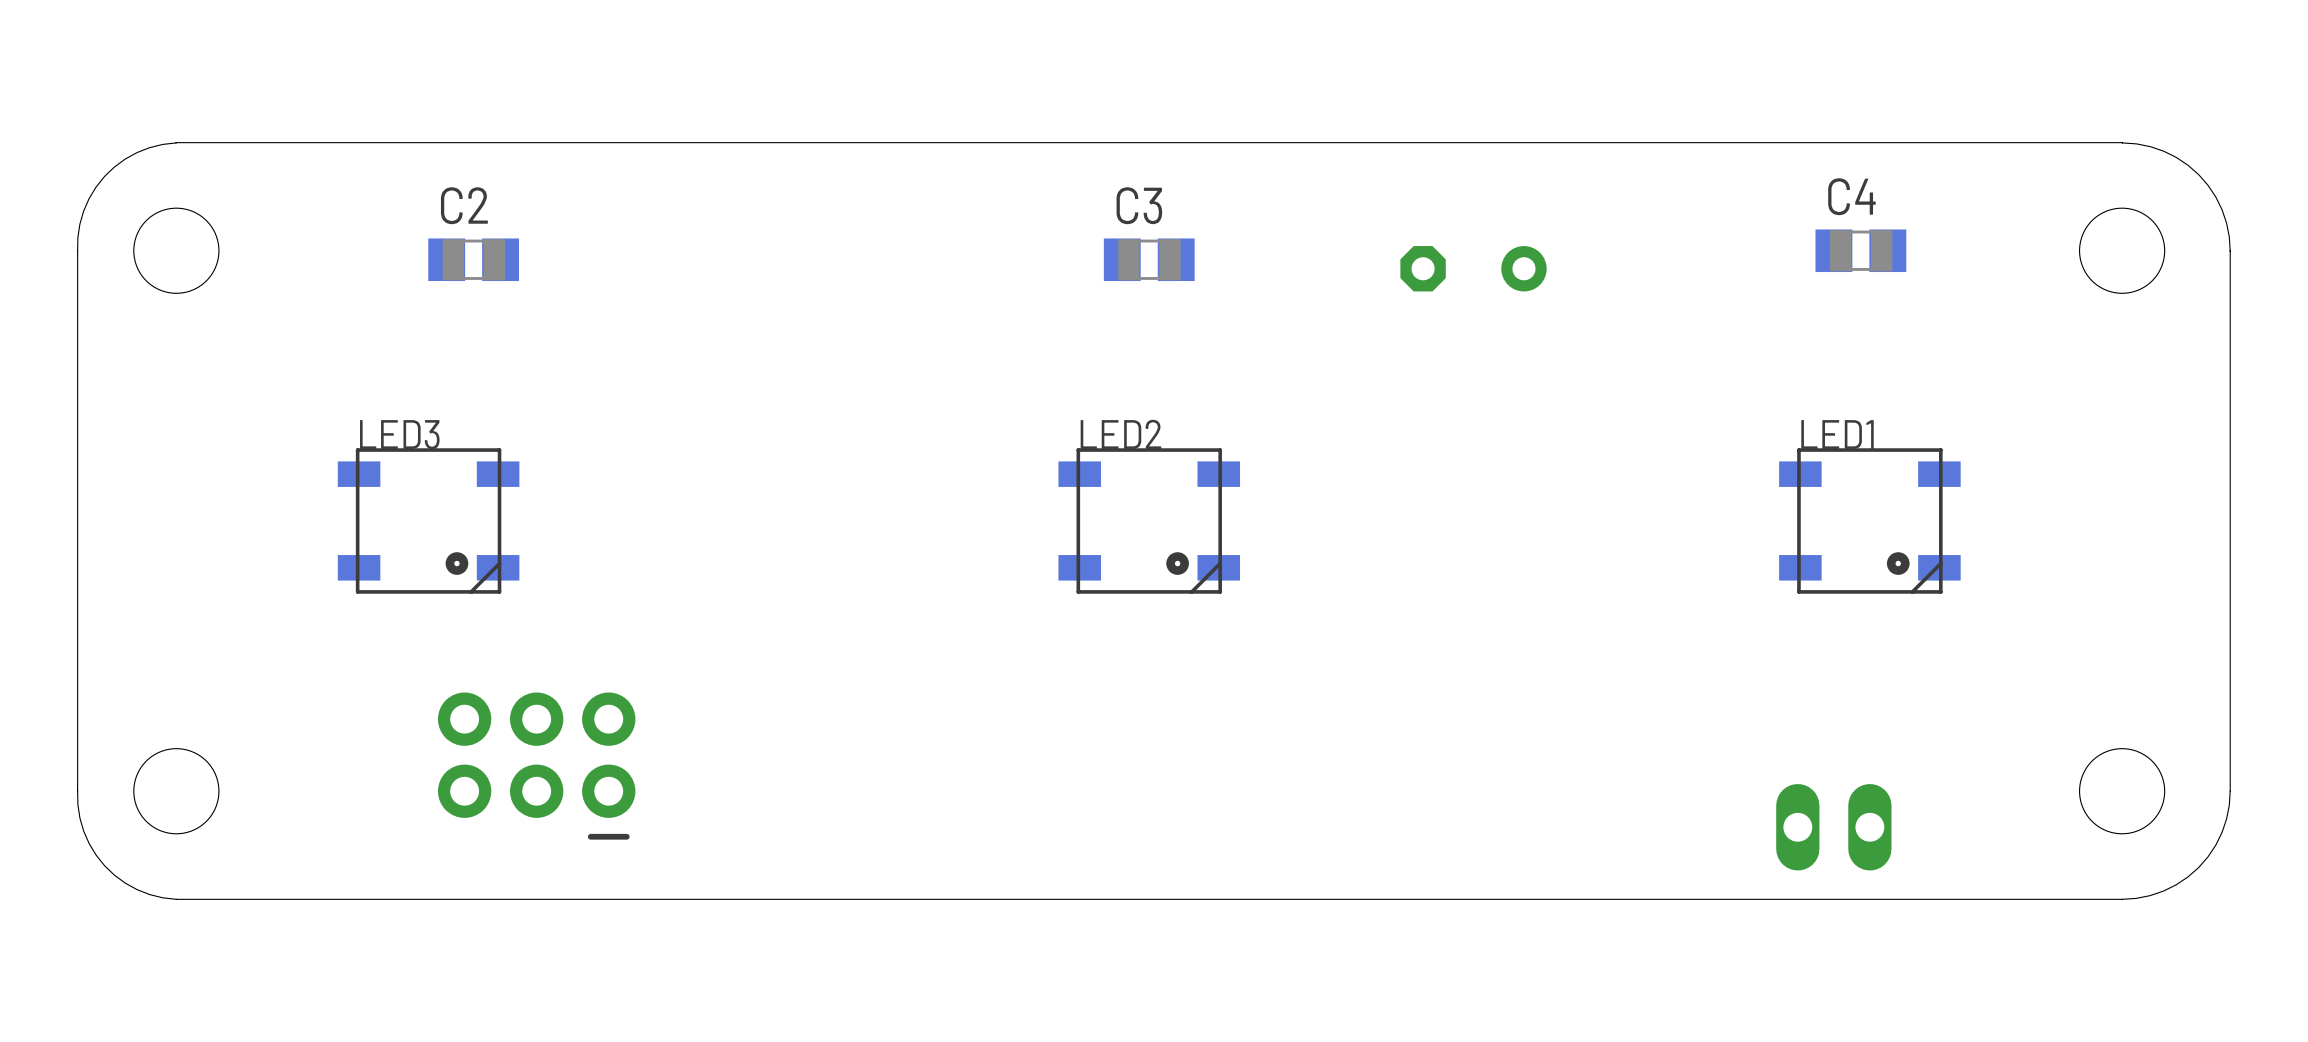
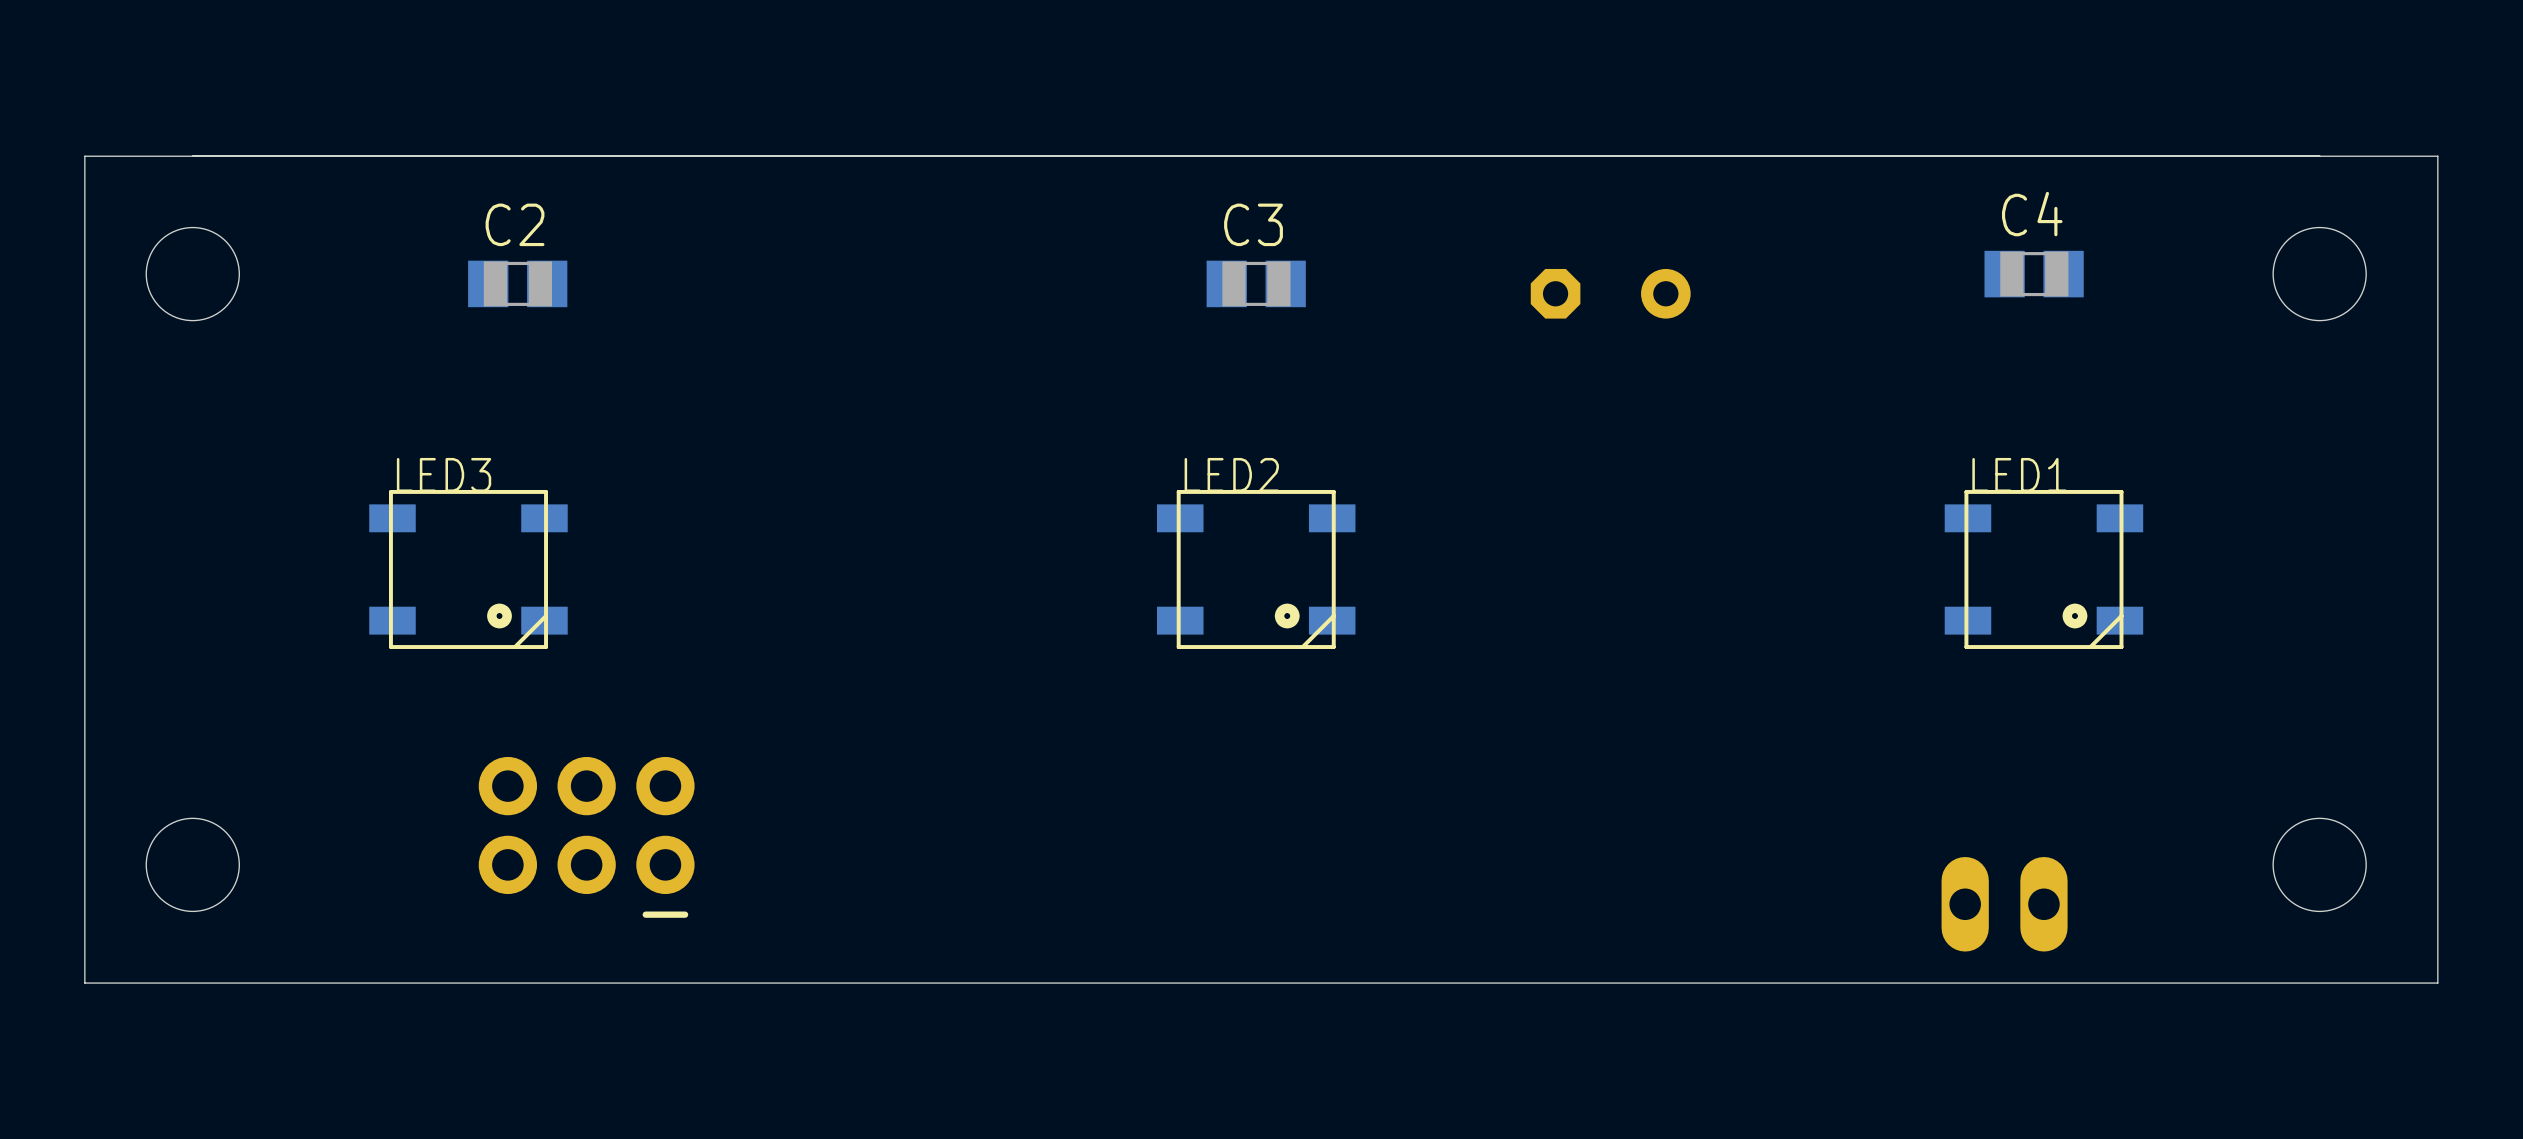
board edge: (176, 142) (162, 144) (136, 152) (114, 167) (104, 176) (89, 198) (83, 211) (79, 224) (77, 251) -> none
board edge: (2122, 142) (2150, 146) (2163, 151) (2188, 165) (2198, 174) (2207, 185) (2222, 209) (2229, 236) (2230, 251) -> (84, 274) (84, 156) (2437, 156) (2437, 274)
board edge: (77, 791) (77, 804) (83, 831) (89, 843) (104, 865) (125, 883) (137, 889) (162, 897) (176, 899) -> (84, 864) (84, 983) (192, 983)
board edge: (2230, 791) (2226, 819) (2221, 832) (2215, 845) (2198, 867) (2176, 884) (2163, 891) (2150, 895) (2122, 899) -> (2437, 864) (2437, 983) (2319, 983)

